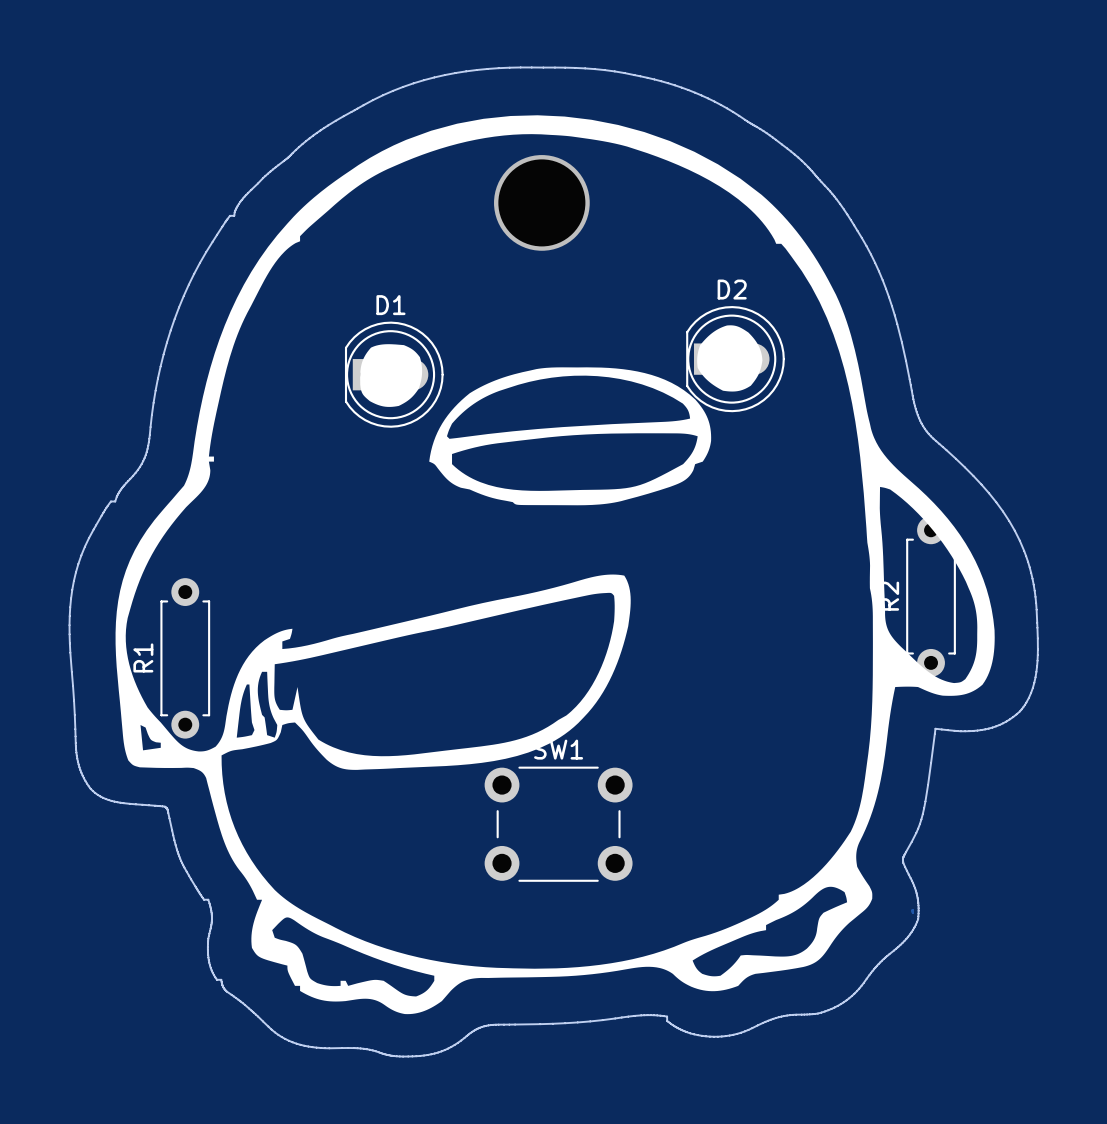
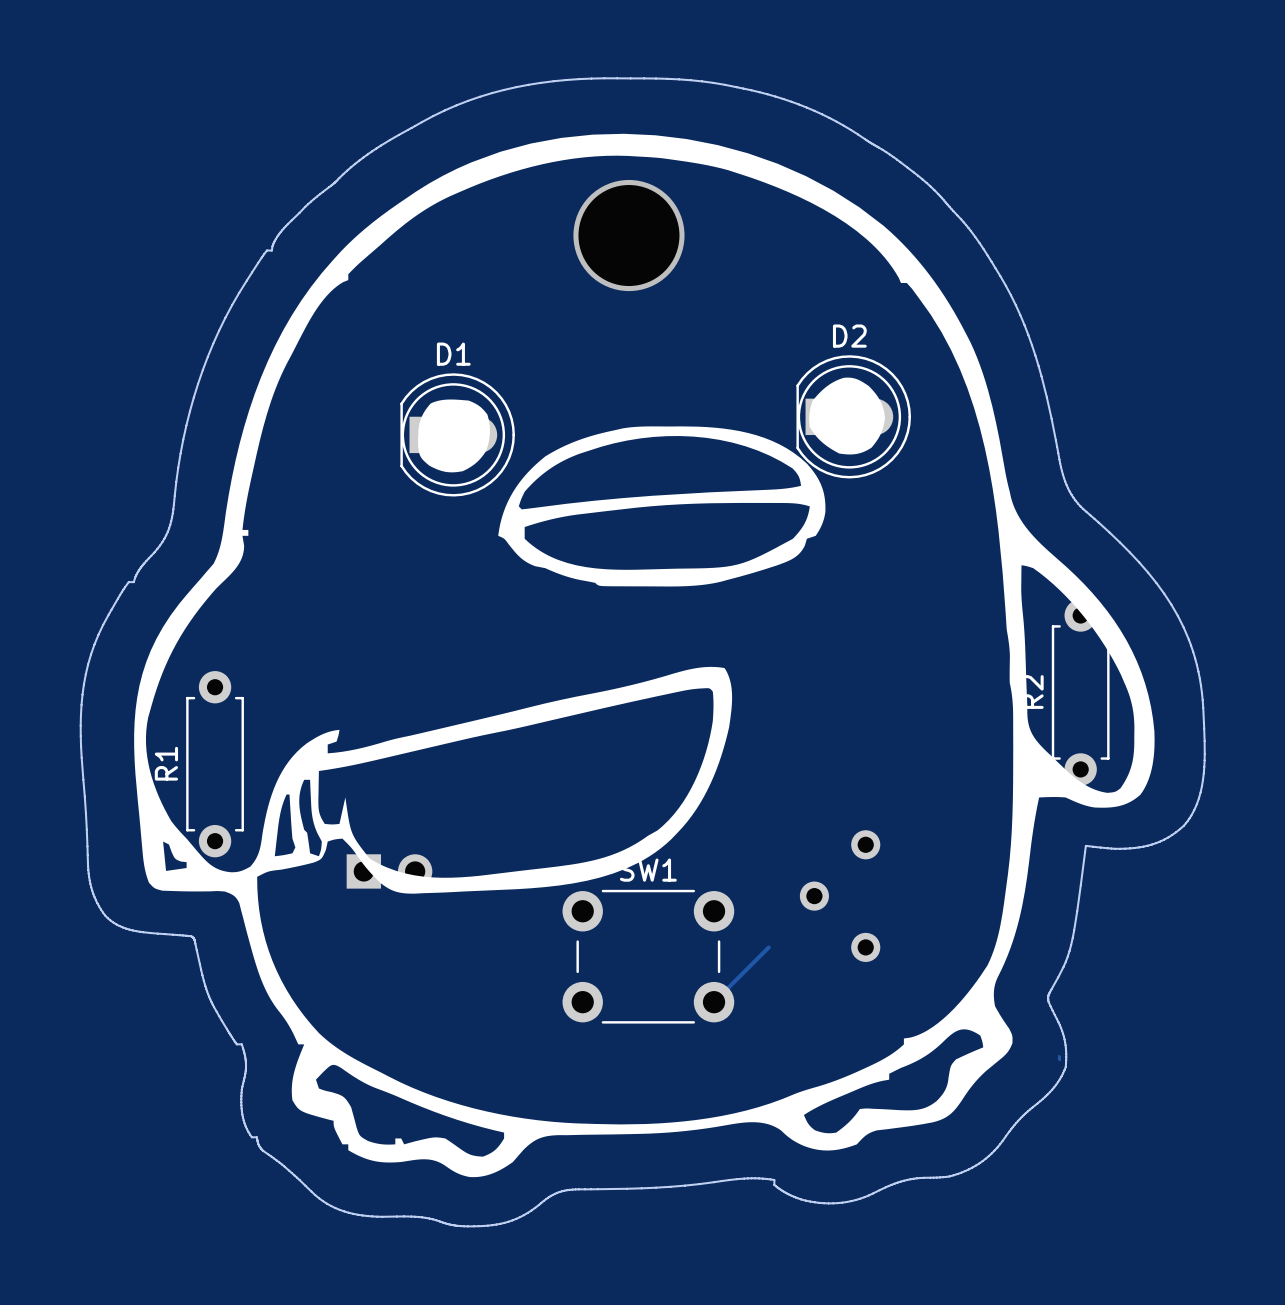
part: none -> (389, 871)
part: none -> (840, 896)
track: none -> (768, 947) (714, 1002)

